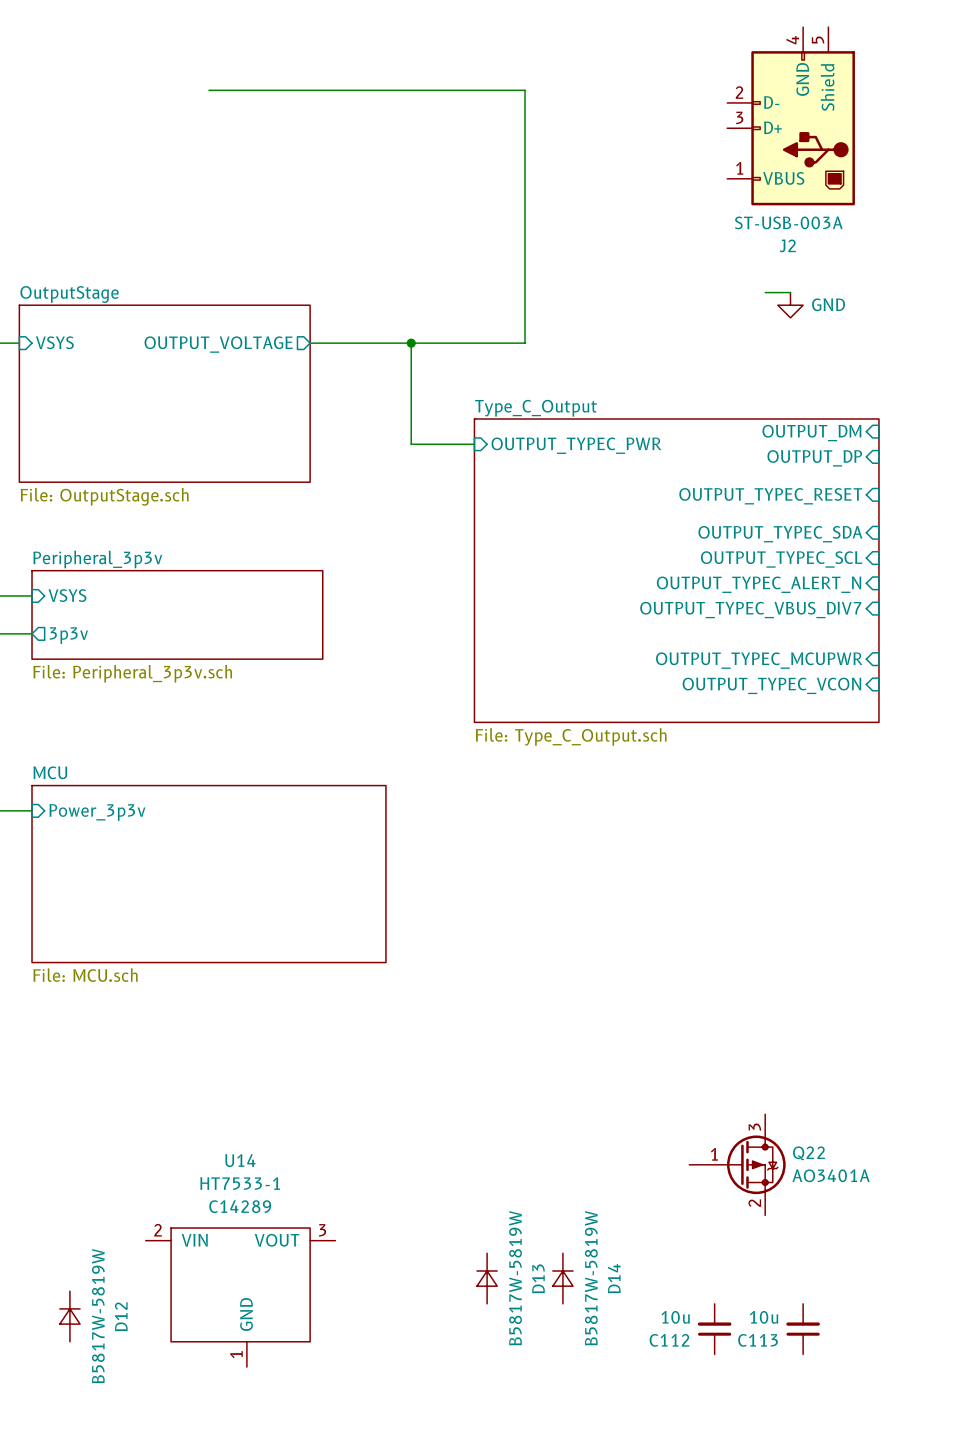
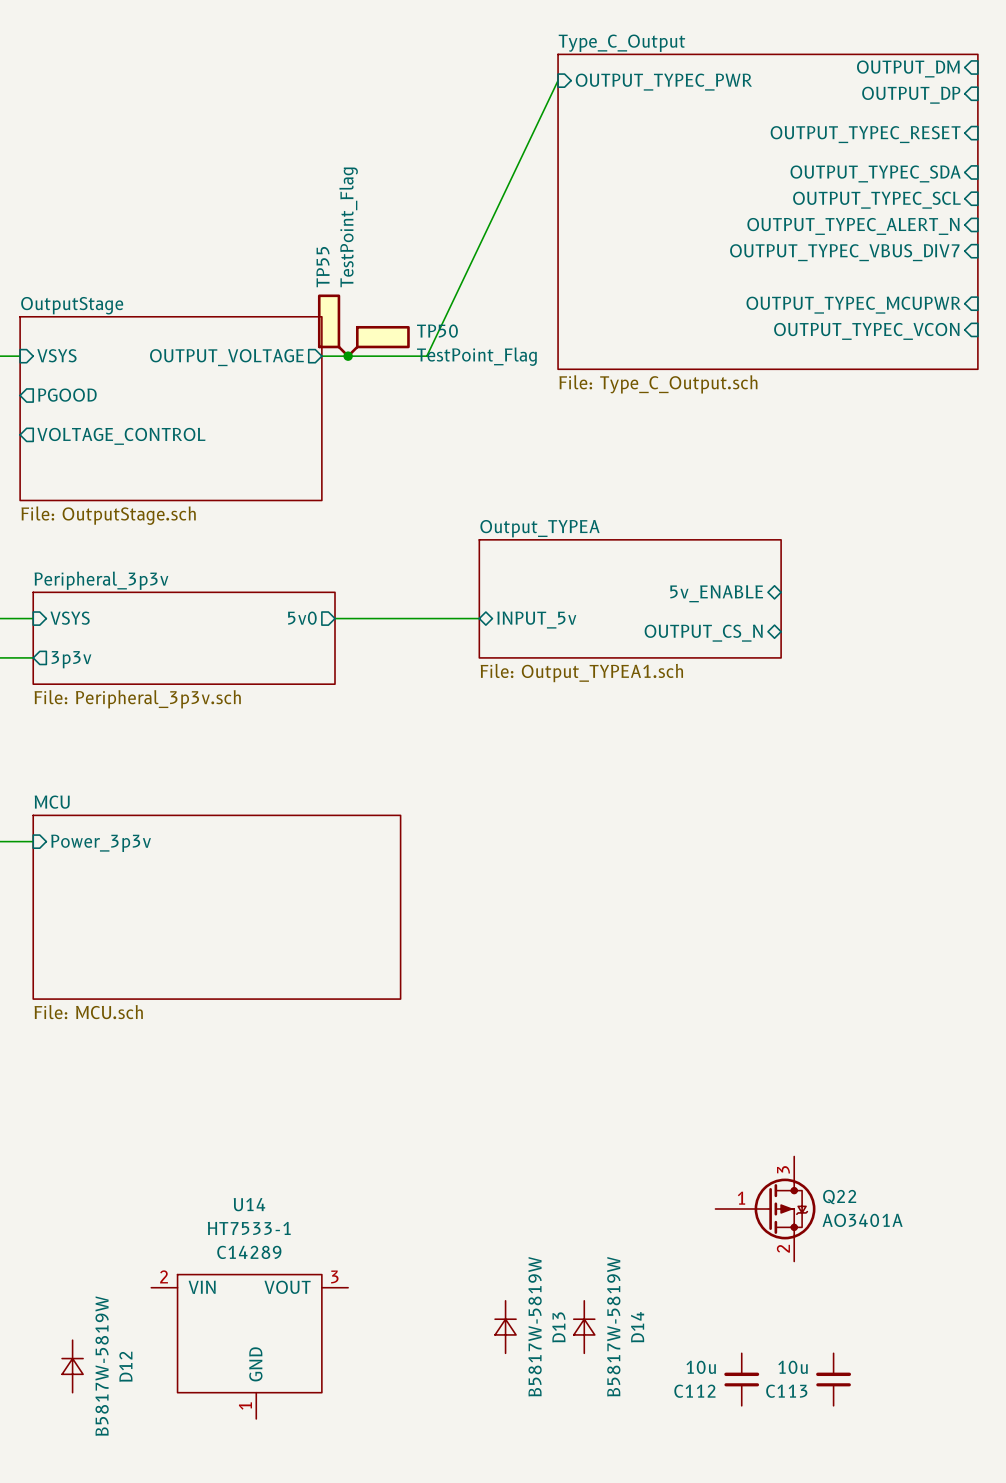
sheet pin: none -> OUTPUT_DM (908, 68)
wire: none -> (558, 80) (426, 356)
sheet pin: none -> OUTPUT_TYPEC_PWR (663, 82)
wire: (208, 90) (525, 90) (525, 343) (411, 343) (411, 444) (474, 444) -> none
sheet pin: none -> OUTPUT_DP (911, 95)
J2: ST-USB-003A (791, 116) -> none
sheet pin: none -> OUTPUT_TYPEC_RESET (865, 134)
sheet pin: none -> OUTPUT_TYPEC_SDA (875, 173)
sheet pin: none -> OUTPUT_TYPEC_SCL (876, 200)
sheet Type_C_Output: none -> File: Type_C_Output.sch (767, 211)
sheet pin: none -> OUTPUT_TYPEC_ALERT_N (853, 226)
sheet pin: none -> OUTPUT_TYPEC_VBUS_DIV7 (844, 252)
wire: (765, 292) (790, 292) -> none
sheet pin: none -> OUTPUT_TYPEC_MCUPWR (853, 305)
power symbol: GND (790, 305) -> none
TP55: none -> TestPoint_Flag (333, 325)
sheet pin: none -> OUTPUT_TYPEC_VCON (866, 331)
TP50: none -> TestPoint_Flag (378, 341)
junction: none -> (348, 356)
junction: (411, 343) -> none
sheet pin: none -> PGOOD (67, 395)
sheet pin: none -> VOLTAGE_CONTROL (121, 436)
sheet pin: OUTPUT_DM (811, 433) -> none
sheet pin: OUTPUT_TYPEC_PWR (576, 445) -> none
sheet pin: OUTPUT_DP (814, 458) -> none
sheet pin: OUTPUT_TYPEC_RESET (770, 496) -> none
sheet pin: OUTPUT_TYPEC_SDA (780, 534) -> none
sheet pin: OUTPUT_TYPEC_SCL (781, 559) -> none
sheet Type_C_Output: File: Type_C_Output.sch (676, 570) -> none
sheet pin: none -> 5v_ENABLE (716, 593)
sheet Output_TYPEA: none -> File: Output_TYPEA1.sch (630, 598)
sheet pin: OUTPUT_TYPEC_ALERT_N (759, 584) -> none
sheet pin: none -> 5v0 (302, 618)
wire: none -> (334, 618) (479, 618)
sheet pin: none -> INPUT_5v (536, 620)
sheet pin: none -> OUTPUT_CS_N (703, 633)
sheet pin: OUTPUT_TYPEC_VBUS_DIV7 (750, 610) -> none
sheet pin: OUTPUT_TYPEC_MCUPWR (759, 660) -> none
sheet pin: OUTPUT_TYPEC_VCON (771, 685) -> none

